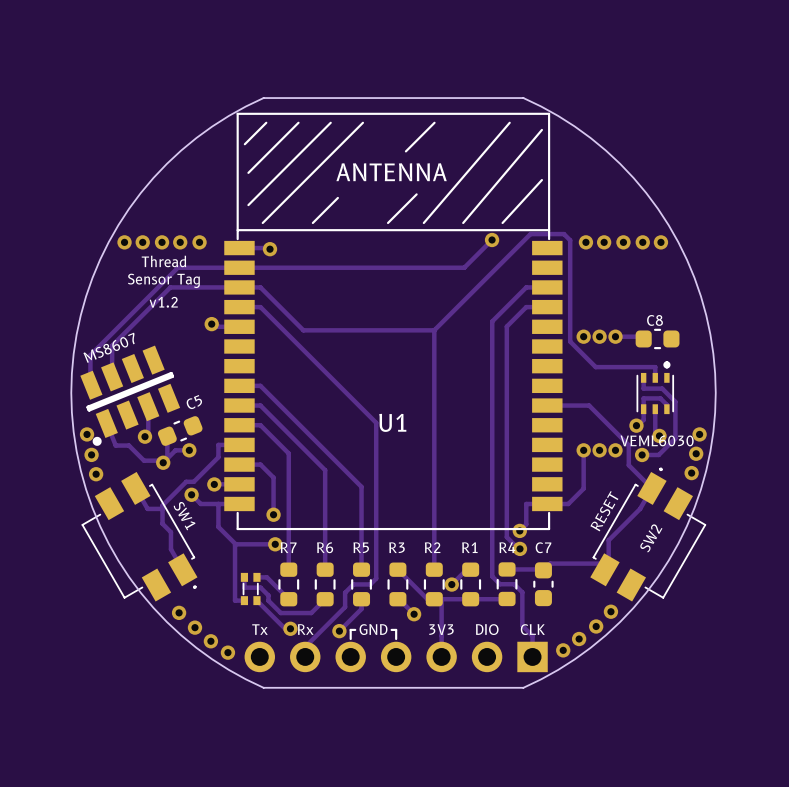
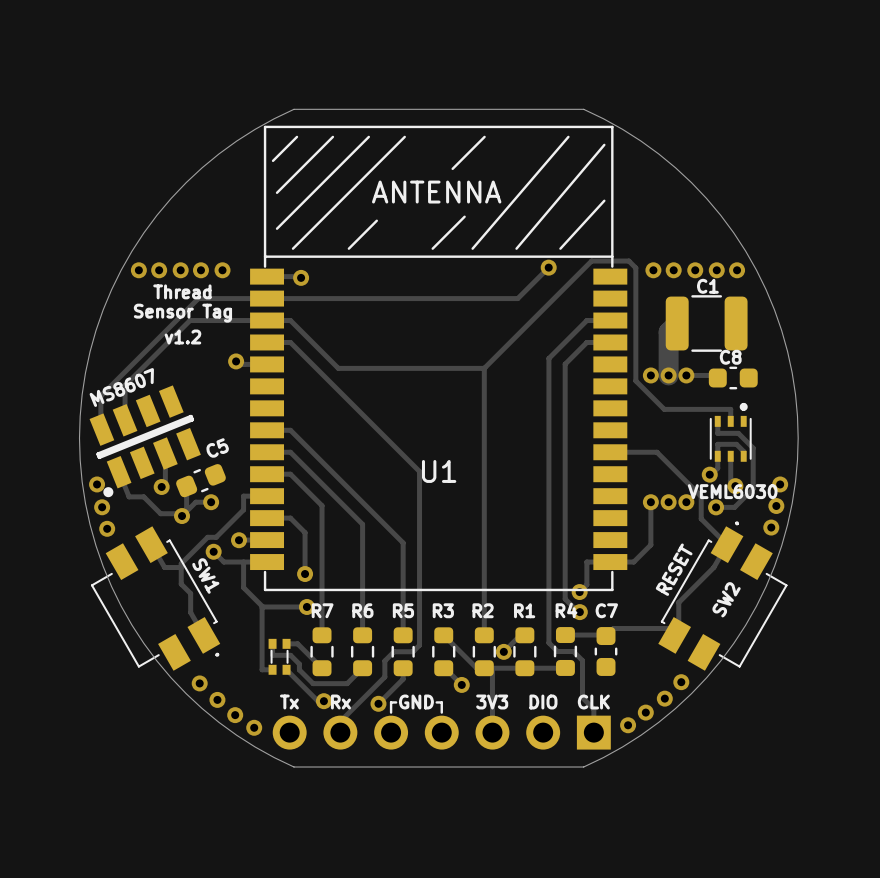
track: none -> (677, 323) (668, 332) (668, 375)
C1: none -> (706, 323)

